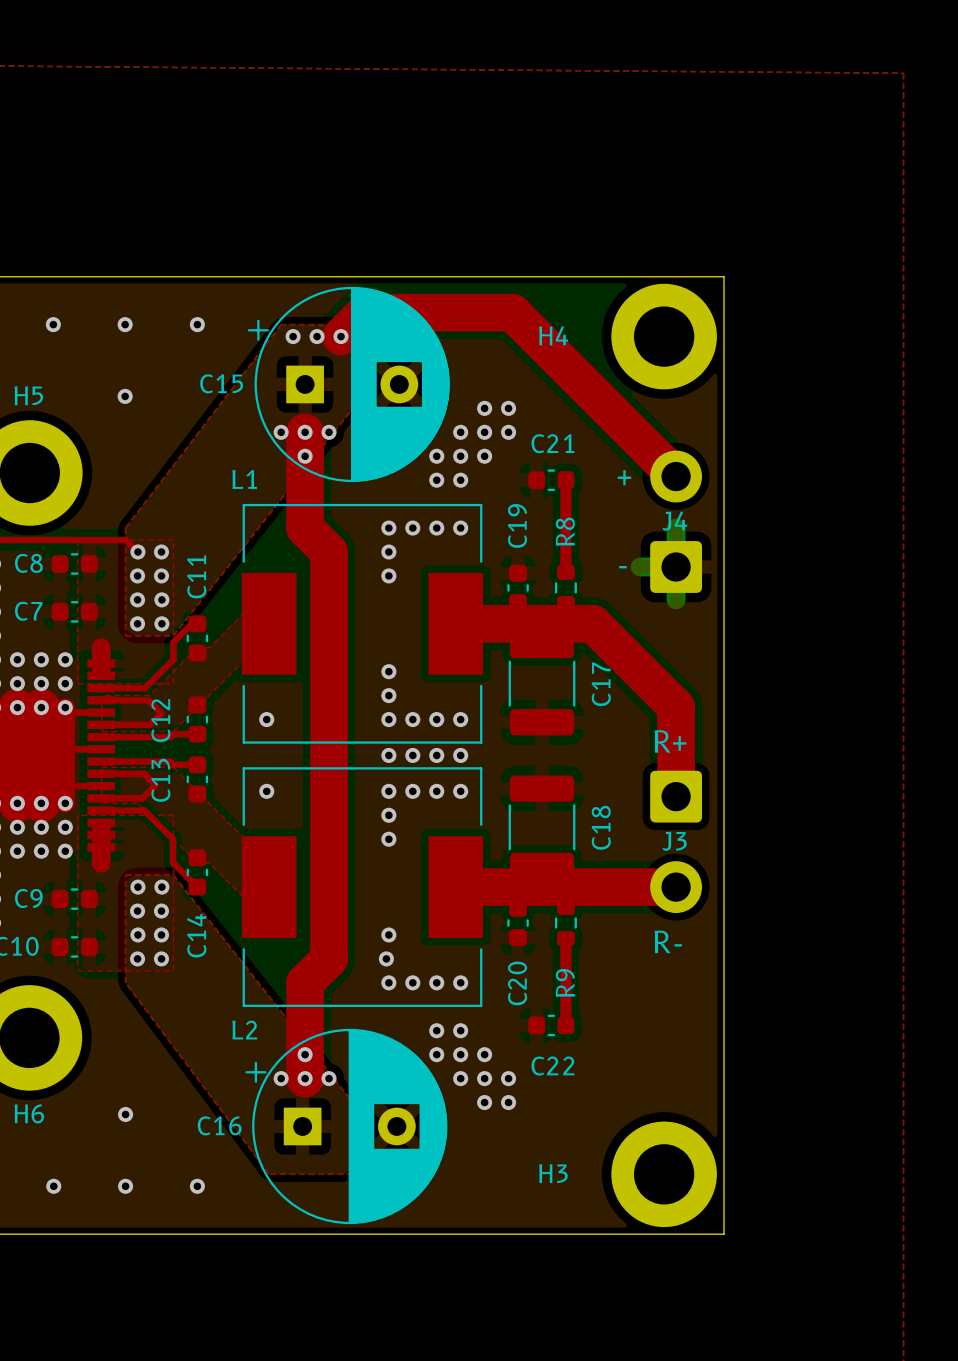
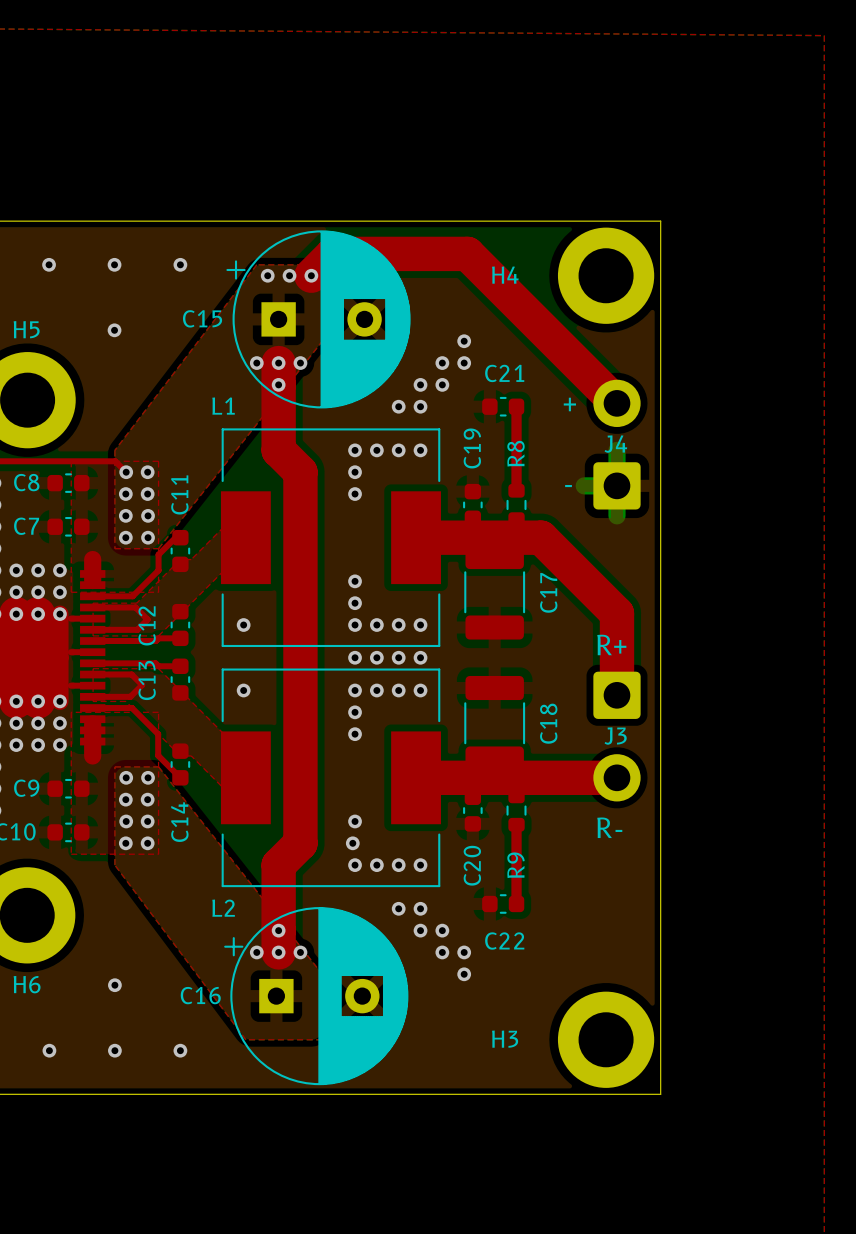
via: (484, 408) -> none
via: (460, 432) -> none
via: (436, 456) -> none
via: (436, 1054) -> none
via: (460, 1078) -> none
via: (484, 1102) -> none

